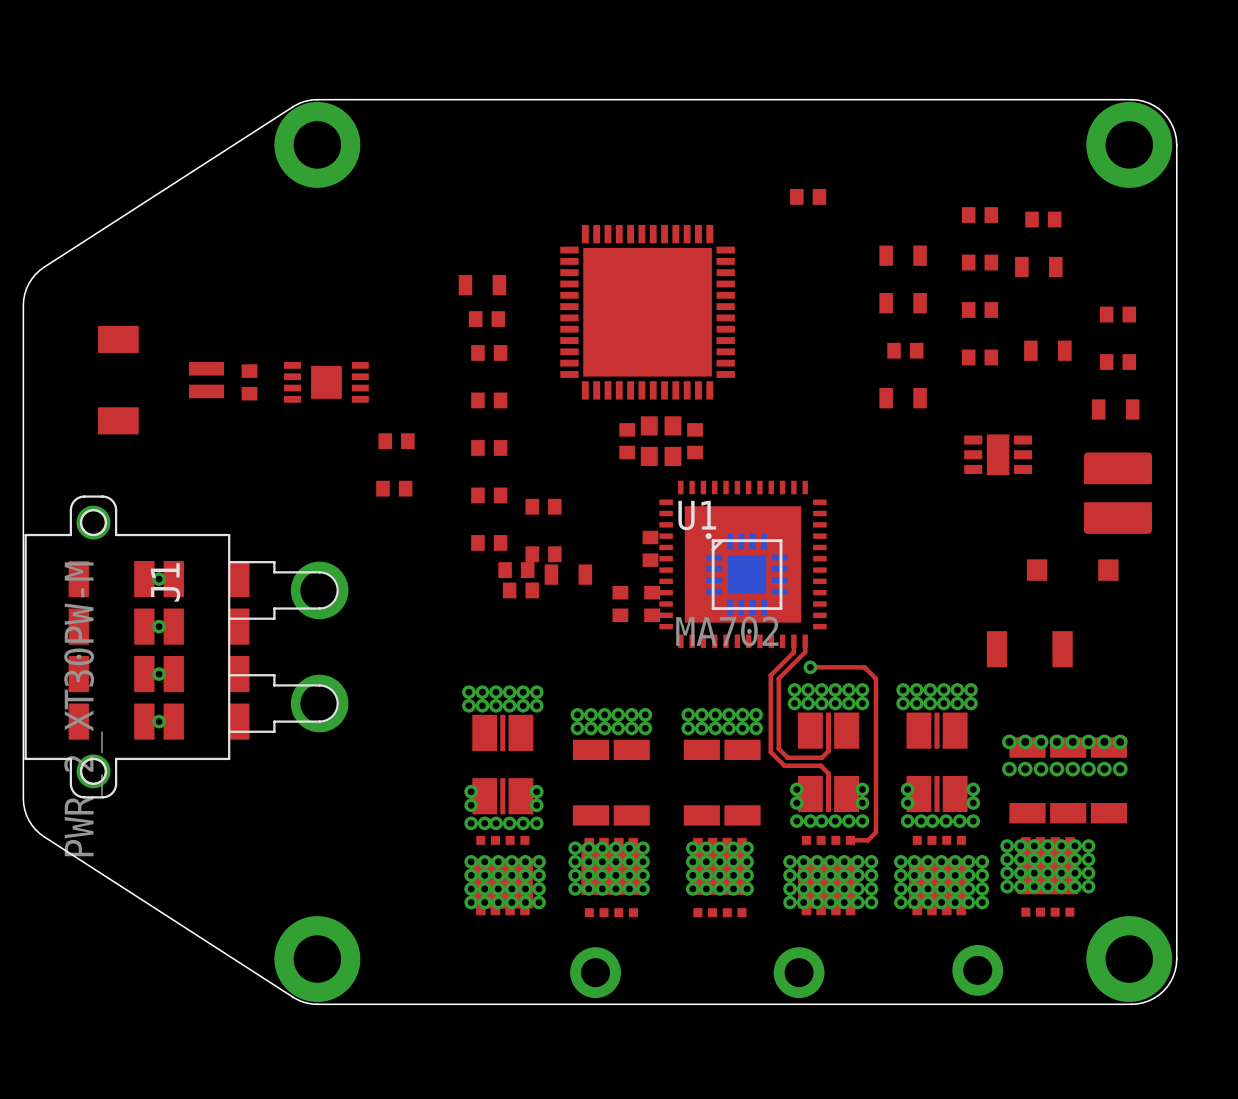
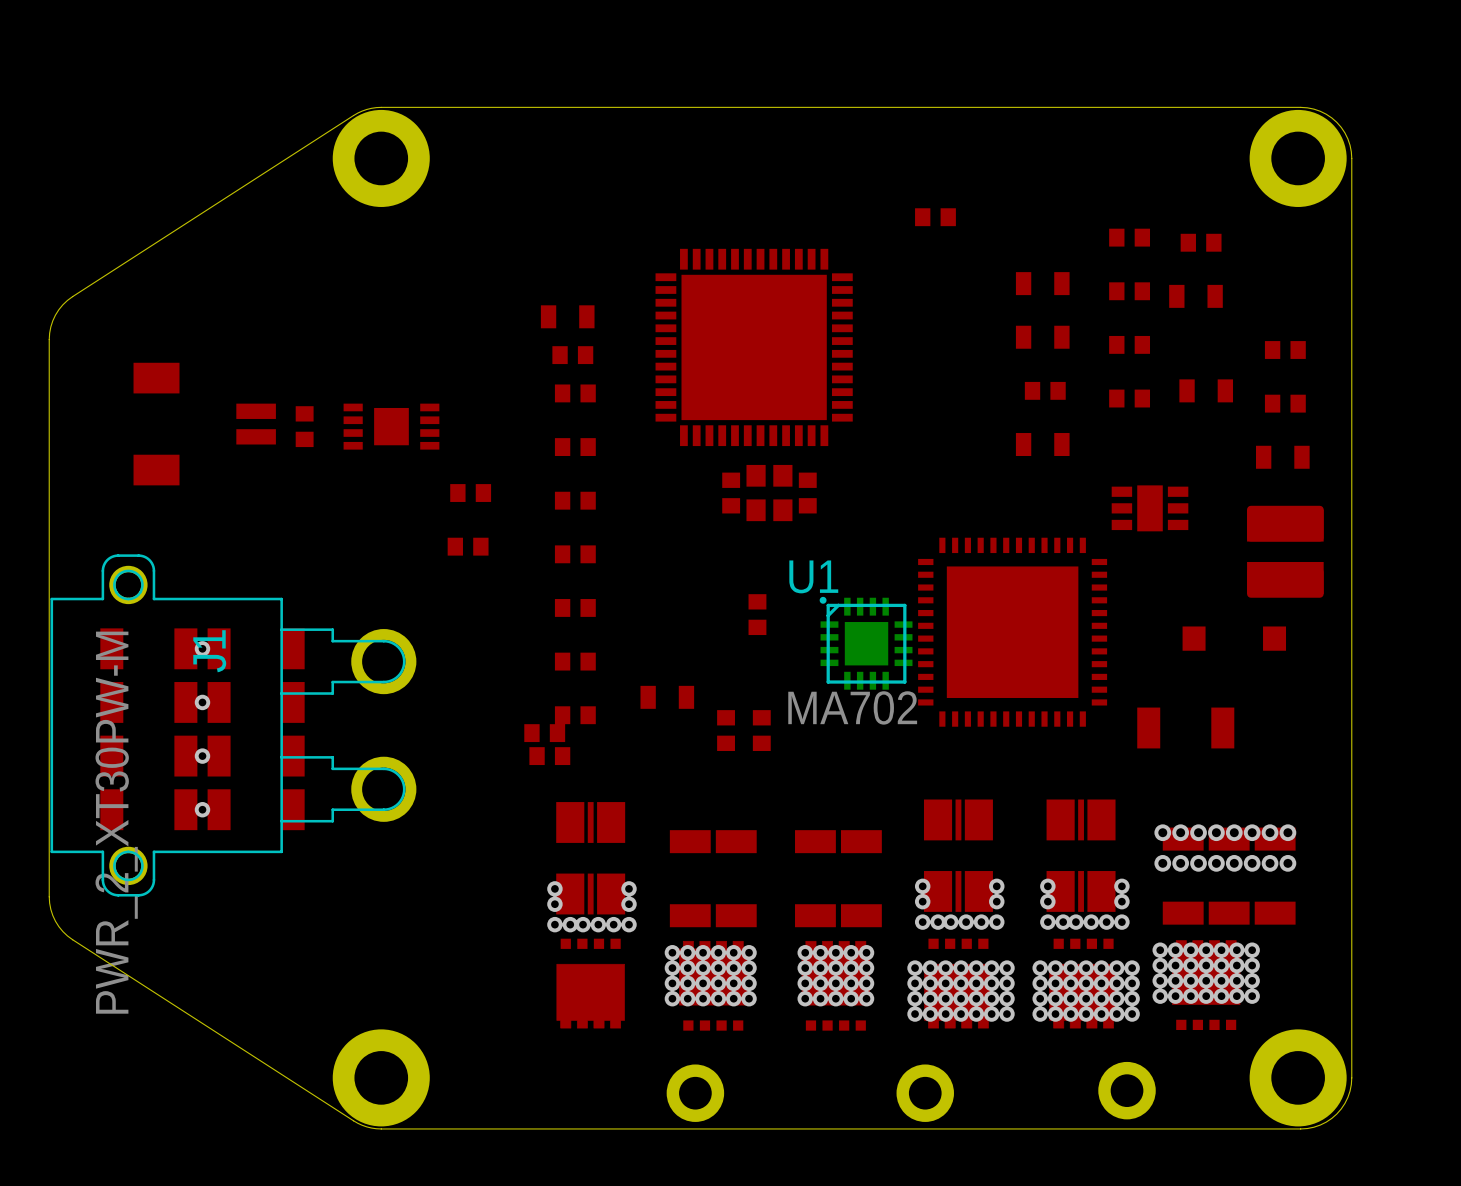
part: (543, 506) -> none
part: (543, 554) -> none
part position: (743, 564) -> (1012, 632)
part: (516, 570) -> none
part position: (568, 574) -> (667, 697)
part: none -> (575, 661)
part: (520, 590) -> none
part: (620, 604) -> none
part: (652, 604) -> none
part: none -> (575, 715)
top track: (793, 641) (793, 652) (770, 675) (770, 752) (784, 765) (820, 765) (828, 773) (828, 793) -> none
top track: (805, 641) (805, 652) (778, 678) (778, 748) (787, 757) (821, 757) (828, 751) (828, 730) -> none
part: none -> (726, 730)
part: none -> (761, 730)
part: none -> (544, 733)
top track: (810, 667) (864, 667) (875, 678) (875, 832) (868, 840) (850, 840) -> none
via: (810, 667) -> none
part: none -> (549, 756)
via: (794, 689) -> none
via: (808, 689) -> none
via: (821, 689) -> none
via: (835, 689) -> none
via: (848, 689) -> none
via: (862, 689) -> none
via: (903, 689) -> none
via: (916, 689) -> none
via: (930, 689) -> none
via: (943, 689) -> none
via: (957, 689) -> none
via: (970, 689) -> none
via: (468, 692) -> none
via: (482, 692) -> none
via: (496, 692) -> none
via: (509, 692) -> none
via: (523, 692) -> none
via: (536, 692) -> none
via: (794, 703) -> none
via: (808, 703) -> none
via: (821, 703) -> none
via: (835, 703) -> none
via: (848, 703) -> none
via: (862, 703) -> none
via: (903, 703) -> none
via: (916, 703) -> none
via: (930, 703) -> none
via: (943, 703) -> none
via: (957, 703) -> none
via: (970, 703) -> none
via: (468, 705) -> none
via: (482, 705) -> none
via: (496, 705) -> none
via: (509, 705) -> none
via: (523, 705) -> none
via: (536, 705) -> none
via: (577, 714) -> none
via: (591, 714) -> none
via: (604, 714) -> none
via: (618, 714) -> none
via: (631, 714) -> none
via: (645, 714) -> none
via: (688, 714) -> none
via: (701, 714) -> none
via: (715, 714) -> none
via: (728, 714) -> none
via: (742, 714) -> none
via: (756, 714) -> none
via: (577, 728) -> none
via: (591, 728) -> none
via: (604, 728) -> none
via: (618, 728) -> none
via: (631, 728) -> none
via: (645, 728) -> none
via: (688, 728) -> none
via: (701, 728) -> none
via: (715, 728) -> none
via: (728, 728) -> none
via: (742, 728) -> none
via: (756, 728) -> none
via: (471, 861) -> none
via: (484, 861) -> none
via: (498, 861) -> none
via: (511, 861) -> none
via: (525, 861) -> none
via: (539, 861) -> none
via: (471, 875) -> none
via: (484, 875) -> none
via: (498, 875) -> none
via: (511, 875) -> none
via: (525, 875) -> none
via: (539, 875) -> none
via: (471, 888) -> none
via: (484, 888) -> none
via: (498, 888) -> none
via: (511, 888) -> none
via: (525, 888) -> none
via: (539, 888) -> none
via: (471, 902) -> none
via: (484, 902) -> none
via: (498, 902) -> none
via: (511, 902) -> none
via: (525, 902) -> none
via: (539, 902) -> none

